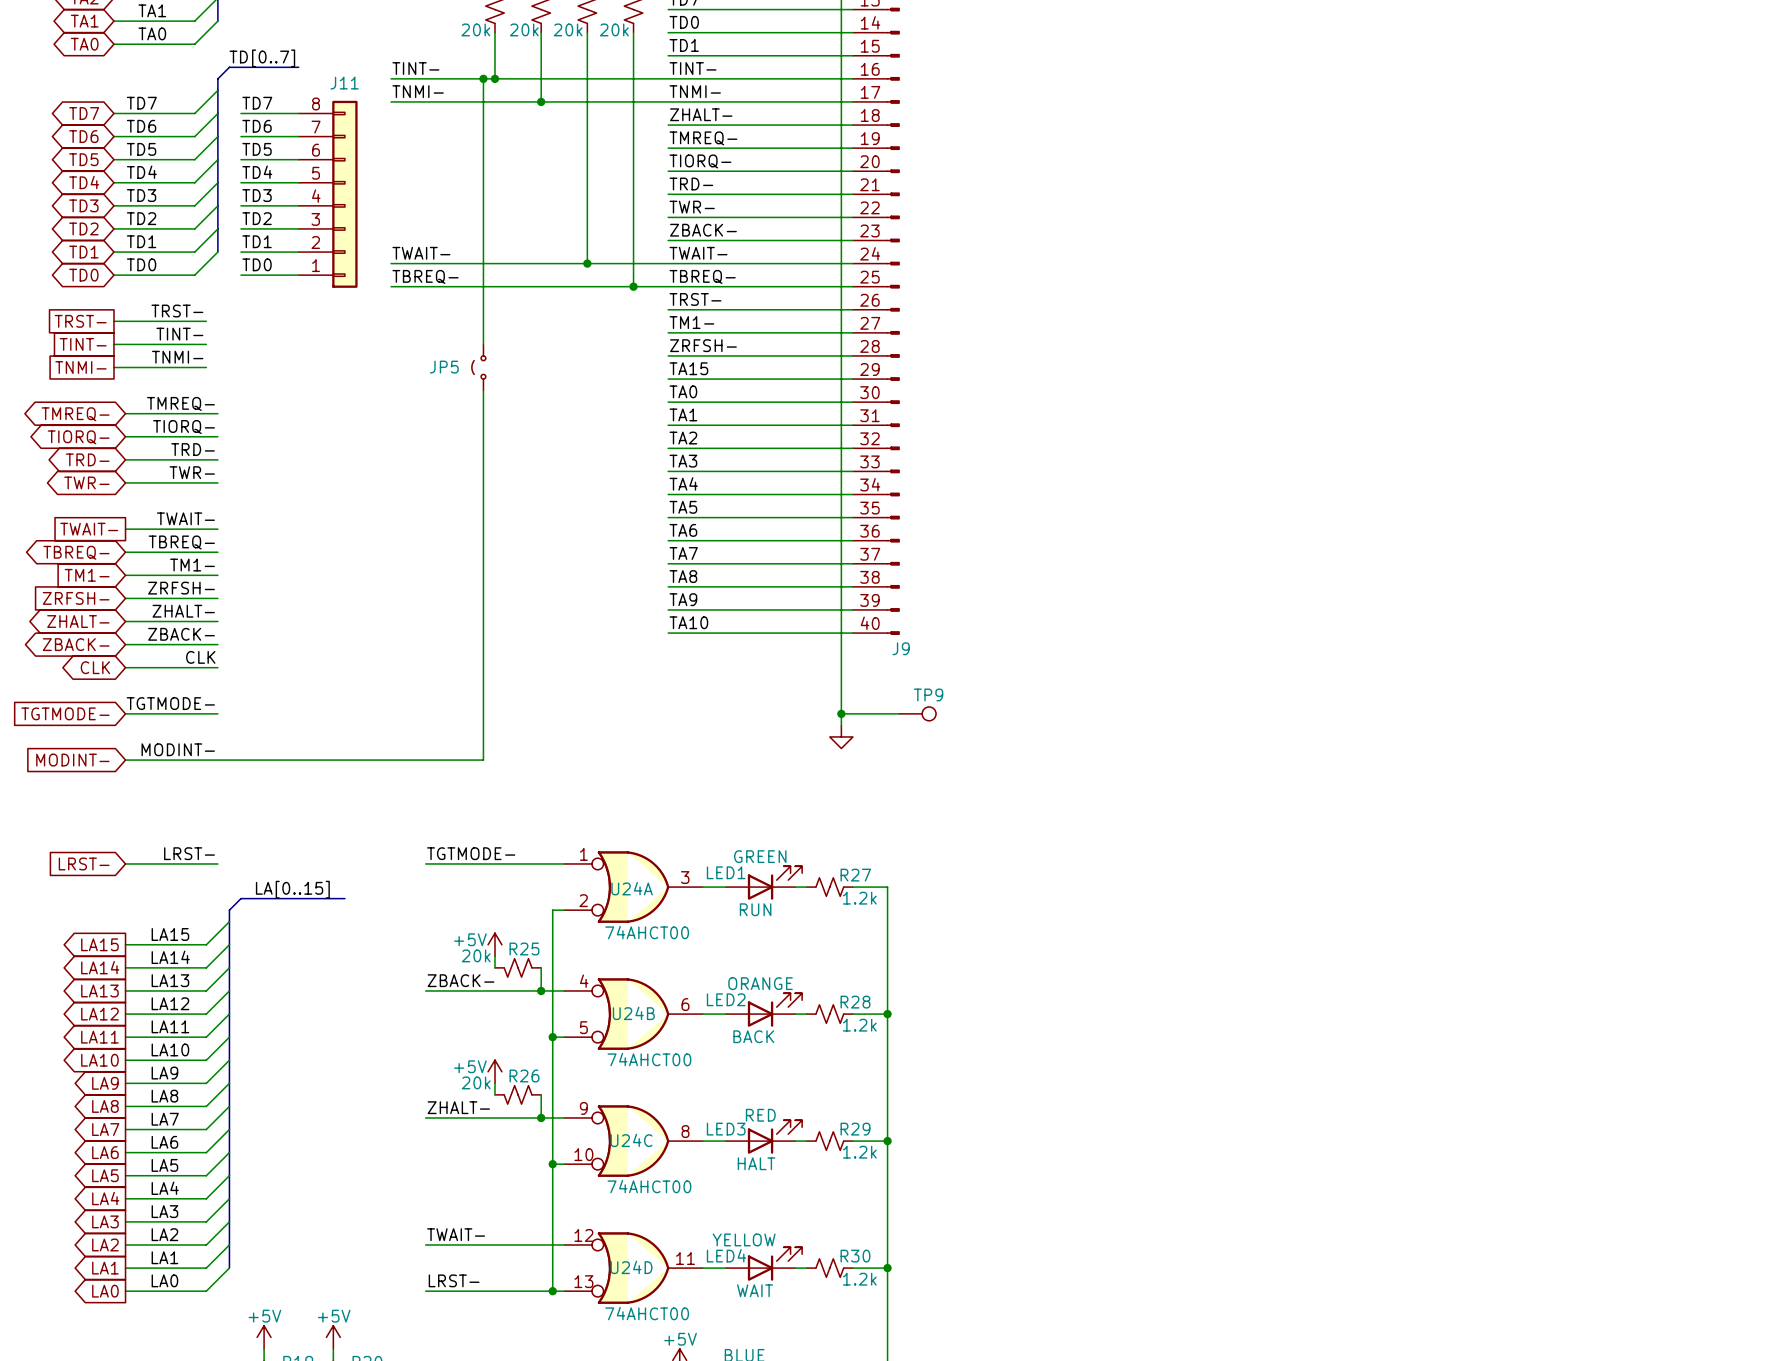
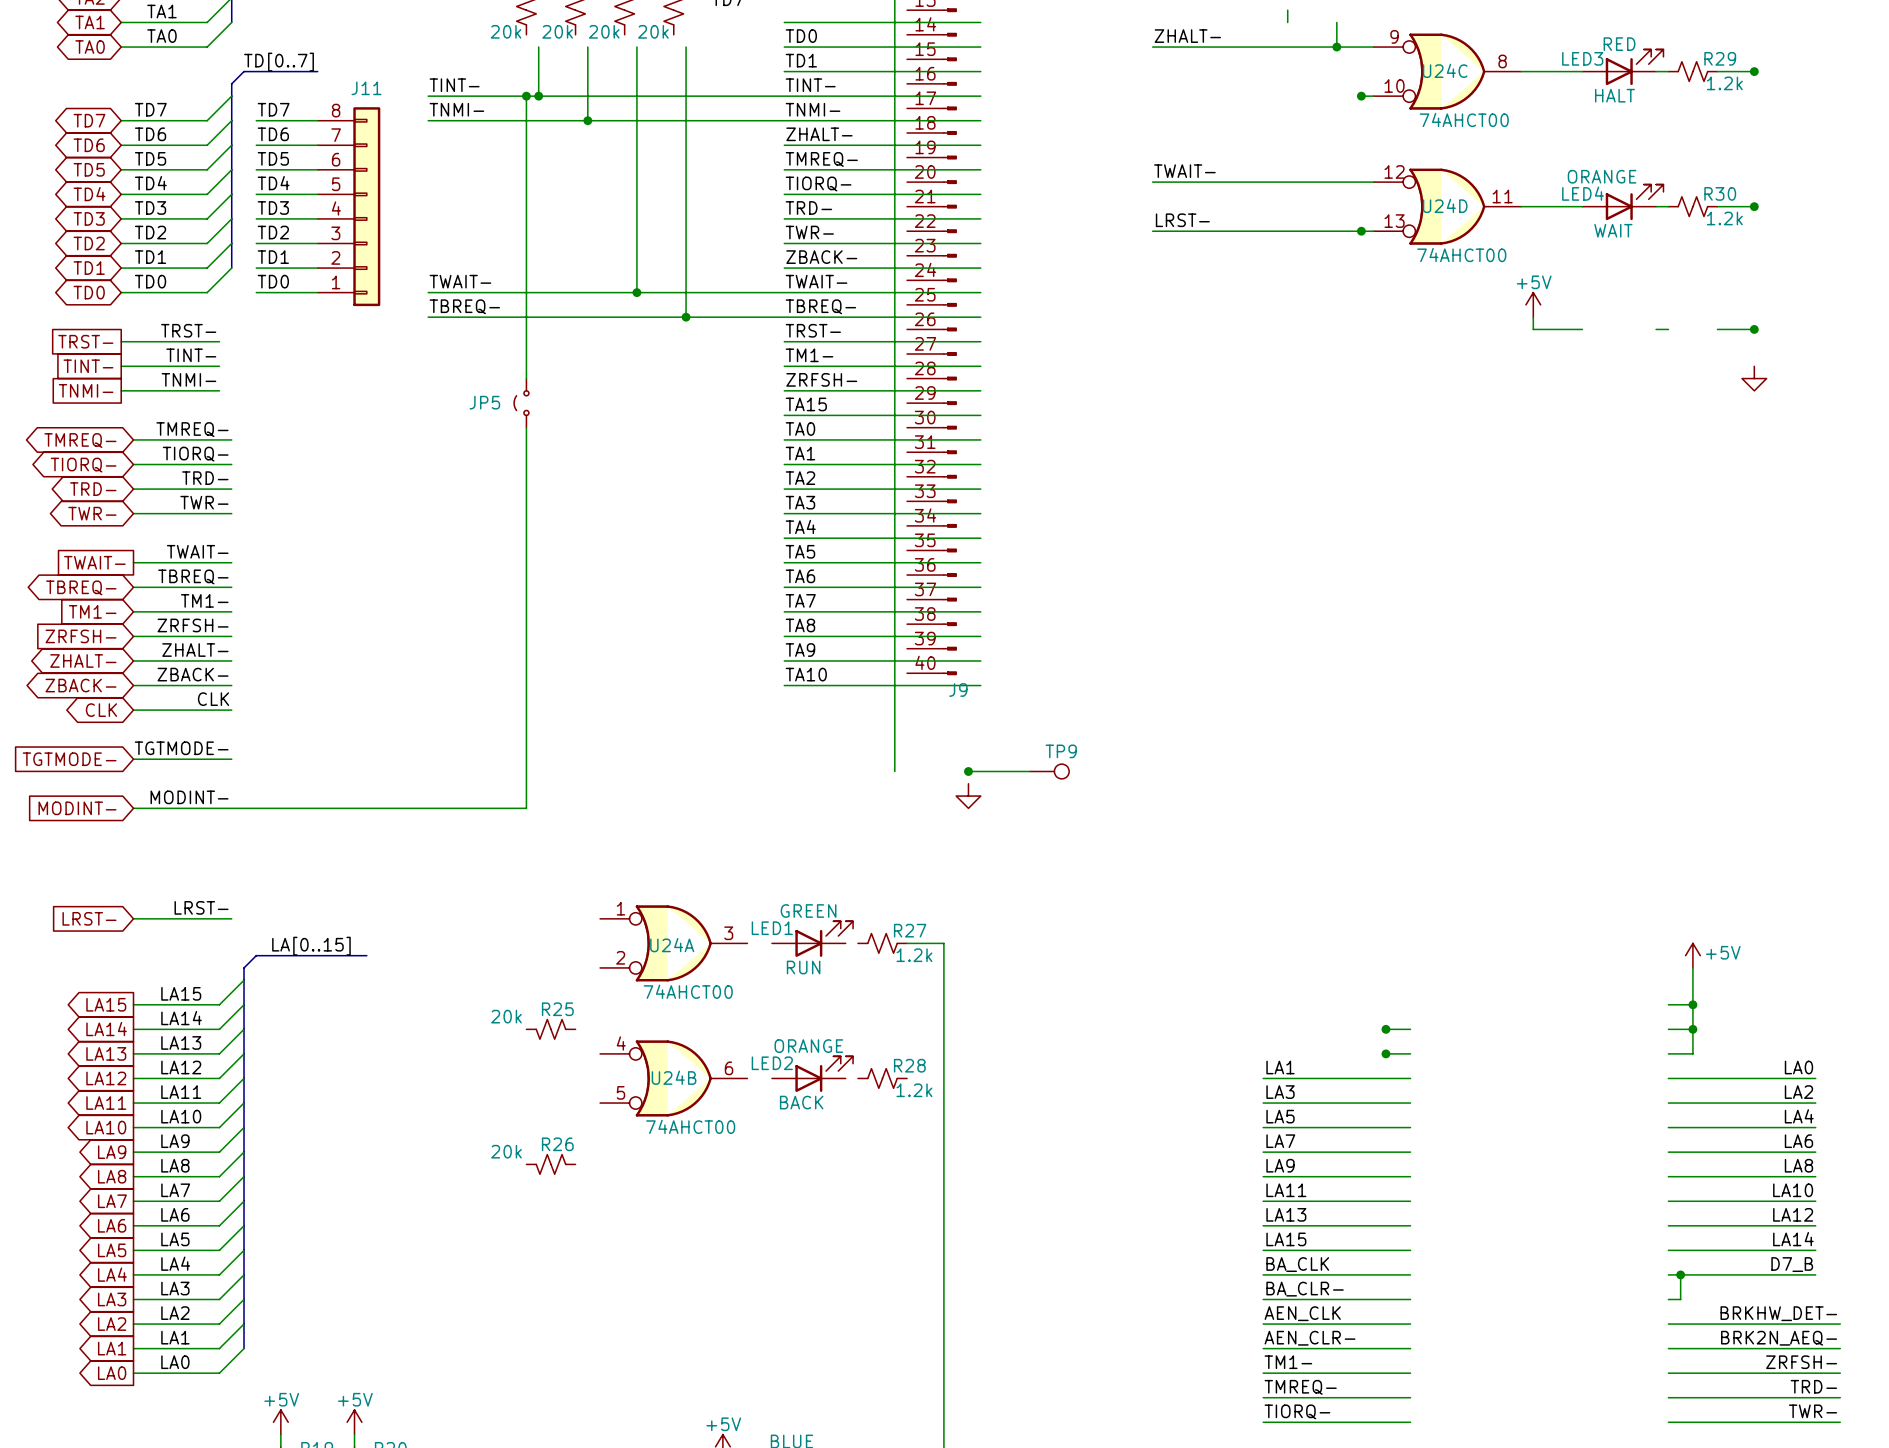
wire: (668, 9) (852, 9) -> (784, 22) (980, 22)
wire: none -> (1287, 10) (1287, 22)
wire: none -> (1336, 22) (1336, 47)
label position: TD0 (684, 22) -> TD0 (801, 36)
wire: (494, 32) (494, 78) -> (538, 47) (538, 96)
wire: (541, 32) (541, 101) -> (587, 47) (587, 120)
wire: (587, 32) (587, 263) -> (636, 47) (636, 292)
wire: (633, 32) (633, 286) -> (686, 47) (686, 317)
wire: (668, 32) (852, 32) -> (784, 47) (980, 47)
label: none -> ZHALT- (1187, 36)
wire: none -> (1152, 47) (1373, 47)
junction: none -> (1336, 47)
label position: TD1 (684, 45) -> TD1 (801, 60)
wire: (668, 55) (852, 55) -> (784, 71) (980, 71)
wire: none -> (1521, 71) (1582, 71)
wire: none -> (1656, 71) (1668, 71)
wire: none -> (1717, 71) (1754, 71)
junction: none -> (1754, 71)
label position: TINT- (415, 68) -> TINT- (454, 85)
label position: TINT- (693, 68) -> TINT- (810, 85)
wire: (391, 78) (852, 78) -> none
wire: (483, 78) (483, 344) -> (526, 96) (526, 378)
junction: (483, 78) -> none
junction: (494, 78) -> none
wire: none -> (428, 96) (980, 96)
junction: none -> (526, 96)
junction: none -> (538, 96)
wire: none -> (1361, 96) (1373, 96)
junction: none -> (1361, 96)
label position: TNMI- (418, 91) -> TNMI- (456, 109)
label position: TNMI- (695, 91) -> TNMI- (813, 109)
wire: (391, 101) (852, 101) -> none
junction position: (541, 101) -> (587, 120)
wire: none -> (428, 120) (980, 120)
label position: ZHALT- (701, 114) -> ZHALT- (819, 134)
wire: (668, 125) (852, 125) -> (784, 145) (980, 145)
label position: TMREQ- (703, 138) -> TMREQ- (821, 159)
wire: (668, 148) (852, 148) -> (784, 169) (980, 169)
label: none -> TWAIT- (1184, 171)
label position: TIORQ- (700, 161) -> TIORQ- (818, 184)
wire: (668, 171) (852, 171) -> (784, 194) (980, 194)
wire: none -> (1152, 182) (1373, 182)
label position: TRD- (691, 184) -> TRD- (808, 207)
wire: (668, 194) (852, 194) -> (784, 218) (980, 218)
wire: none -> (1521, 206) (1582, 206)
wire: none -> (1656, 206) (1668, 206)
wire: none -> (1717, 206) (1754, 206)
junction: none -> (1754, 206)
label position: TWR- (692, 207) -> TWR- (809, 232)
label: none -> LRST- (1182, 220)
wire: (668, 217) (852, 217) -> (784, 243) (980, 243)
wire: none -> (1152, 231) (1373, 231)
junction: none -> (1361, 231)
label position: ZBACK- (703, 230) -> ZBACK- (821, 257)
wire: (668, 240) (852, 240) -> (784, 268) (980, 268)
label position: TWAIT- (421, 253) -> TWAIT- (460, 281)
label position: TWAIT- (698, 253) -> TWAIT- (816, 281)
wire: (391, 263) (852, 263) -> none
junction position: (587, 263) -> (636, 292)
wire: none -> (428, 292) (980, 292)
label position: TBREQ- (425, 276) -> TBREQ- (464, 306)
label position: TBREQ- (702, 276) -> TBREQ- (820, 306)
wire: (391, 286) (852, 286) -> none
junction position: (633, 286) -> (686, 317)
power symbol: none -> +5V (1533, 304)
wire: none -> (428, 317) (980, 317)
wire: none -> (1533, 317) (1533, 329) (1582, 329)
label position: TRST- (695, 299) -> TRST- (813, 330)
wire: (668, 309) (852, 309) -> (784, 341) (980, 341)
wire: none -> (1656, 329) (1668, 329)
wire: none -> (1717, 329) (1754, 329)
junction: none -> (1754, 329)
label position: TM1- (691, 322) -> TM1- (809, 355)
wire: (668, 332) (852, 332) -> (784, 366) (980, 366)
label position: ZRFSH- (703, 345) -> ZRFSH- (821, 379)
wire: (668, 355) (852, 355) -> (784, 390) (980, 390)
power symbol: none -> (1754, 378)
JP5 position: (478, 367) -> (521, 403)
label position: TA15 (688, 368) -> TA15 (806, 404)
wire: (668, 379) (852, 379) -> (784, 415) (980, 415)
wire: (483, 390) (483, 760) -> (526, 427) (526, 808) (514, 808)
label position: TA0 (683, 391) -> TA0 (800, 429)
wire: (668, 402) (852, 402) -> (784, 439) (980, 439)
label position: TA1 (683, 414) -> TA1 (800, 453)
wire: (668, 425) (852, 425) -> (784, 464) (980, 464)
label position: TA2 (683, 438) -> TA2 (800, 478)
wire: (668, 448) (852, 448) -> (784, 489) (980, 489)
label position: TA3 (683, 461) -> TA3 (800, 502)
wire: (668, 471) (852, 471) -> (784, 513) (980, 513)
label position: TA4 (683, 483) -> TA4 (800, 526)
wire: (668, 494) (852, 494) -> (784, 538) (980, 538)
label position: TA5 (683, 507) -> TA5 (800, 551)
wire: (668, 517) (852, 517) -> (784, 562) (980, 562)
label position: TA6 (683, 530) -> TA6 (800, 576)
wire: (668, 540) (852, 540) -> (784, 587) (980, 587)
label position: TA7 (683, 553) -> TA7 (800, 600)
wire: (668, 563) (852, 563) -> (784, 611) (980, 611)
label position: TA8 (683, 576) -> TA8 (800, 625)
wire: (668, 586) (852, 586) -> (784, 636) (980, 636)
label position: TA9 (683, 599) -> TA9 (800, 650)
wire: (668, 609) (852, 609) -> (784, 660) (980, 660)
label position: TA10 (688, 622) -> TA10 (806, 674)
wire: (668, 633) (852, 633) -> (784, 685) (980, 685)
wire: (841, 713) (899, 713) -> (968, 771) (1029, 771)
junction: (841, 713) -> none
TP9 position: (917, 713) -> (1049, 771)
junction: none -> (968, 771)
power symbol position: (841, 736) -> (968, 796)
label: TGTMODE- (471, 853) -> none
wire: (425, 863) (564, 863) -> none
wire: (702, 887) (725, 887) -> none
wire: (795, 887) (806, 887) -> none
power symbol: none -> +5V (1692, 955)
wire: (564, 910) (552, 910) (552, 1291) -> none
wire: none -> (1692, 967) (1692, 1053) (1668, 1053)
power symbol: +5V (494, 944) -> none
wire: none -> (1668, 1004) (1692, 1004)
junction: none -> (1692, 1004)
wire: (494, 956) (494, 967) -> none
wire: (541, 967) (541, 990) -> none
wire: none -> (1385, 1029) (1410, 1029)
junction: none -> (1385, 1029)
wire: none -> (1668, 1029) (1692, 1029)
junction: none -> (1692, 1029)
label: ZBACK- (460, 980) -> none
wire: (425, 990) (564, 990) -> none
junction: (541, 990) -> none
wire: none -> (1385, 1053) (1410, 1053)
junction: none -> (1385, 1053)
label: none -> LA1 (1280, 1067)
label: none -> LA0 (1798, 1067)
wire: (702, 1014) (725, 1014) -> none
wire: (795, 1014) (806, 1014) -> none
wire: (852, 1014) (887, 1014) -> none
junction: (887, 1014) -> none
wire: none -> (1263, 1078) (1410, 1078)
wire: none -> (1668, 1078) (1815, 1078)
label: none -> LA3 (1280, 1092)
label: none -> LA2 (1798, 1092)
wire: (552, 1037) (564, 1037) -> none
junction: (552, 1037) -> none
wire: none -> (1263, 1103) (1410, 1103)
wire: none -> (1668, 1103) (1815, 1103)
label: none -> LA5 (1280, 1116)
label: none -> LA4 (1799, 1116)
wire: none -> (1263, 1127) (1410, 1127)
wire: none -> (1668, 1127) (1815, 1127)
power symbol: +5V (494, 1071) -> none
label: none -> LA7 (1280, 1141)
label: none -> LA6 (1798, 1141)
wire: (494, 1083) (494, 1094) -> none
wire: none -> (1263, 1152) (1410, 1152)
wire: none -> (1668, 1152) (1815, 1152)
wire: (541, 1094) (541, 1117) -> none
label: none -> LA9 (1280, 1165)
label: none -> LA8 (1798, 1165)
wire: none -> (1263, 1176) (1410, 1176)
wire: none -> (1668, 1176) (1815, 1176)
label: ZHALT- (458, 1107) -> none
wire: (425, 1117) (564, 1117) -> none
junction: (541, 1117) -> none
label: none -> LA11 (1286, 1190)
label: none -> LA10 (1793, 1190)
wire: none -> (1263, 1201) (1410, 1201)
wire: none -> (1668, 1201) (1815, 1201)
LED3 position: (764, 1137) -> (1622, 67)
U24C position: (633, 1141) -> (1447, 71)
wire: (702, 1141) (725, 1141) -> none
wire: (795, 1141) (806, 1141) -> none
R29 position: (829, 1141) -> (1692, 71)
wire: (852, 1141) (887, 1141) -> none
junction: (887, 1141) -> none
label: none -> LA13 (1286, 1214)
label: none -> LA12 (1793, 1214)
wire: none -> (1263, 1225) (1410, 1225)
wire: none -> (1668, 1225) (1815, 1225)
wire: (552, 1164) (564, 1164) -> none
junction: (552, 1164) -> none
label: none -> LA15 (1286, 1239)
label: none -> LA14 (1793, 1239)
wire: none -> (1263, 1250) (1410, 1250)
wire: none -> (1668, 1250) (1815, 1250)
label: none -> BA_CLK (1297, 1264)
label: none -> D7_B (1792, 1264)
wire: none -> (1263, 1274) (1410, 1274)
wire: none -> (1668, 1274) (1815, 1274)
wire: none -> (1680, 1274) (1680, 1299) (1668, 1299)
junction: none -> (1680, 1274)
label: none -> BA_CLR- (1305, 1289)
wire: none -> (1263, 1299) (1410, 1299)
label: TWAIT- (456, 1234) -> none
label: none -> AEN_CLK (1302, 1313)
label: none -> BRKHW_DET- (1778, 1313)
LED4 text: YELLOW (744, 1239) -> ORANGE (1602, 176)
wire: (425, 1244) (564, 1244) -> none
wire: none -> (1263, 1324) (1410, 1324)
wire: none -> (1668, 1324) (1840, 1324)
label: none -> AEN_CLR- (1310, 1338)
label: none -> BRK2N_AEQ- (1779, 1338)
LED4 position: (764, 1264) -> (1622, 202)
U24D position: (633, 1268) -> (1447, 206)
wire: (702, 1268) (725, 1268) -> none
wire: (795, 1268) (806, 1268) -> none
R30 position: (829, 1268) -> (1692, 206)
wire: (852, 1268) (887, 1268) -> none
junction: (887, 1268) -> none
wire: none -> (1263, 1348) (1410, 1348)
wire: none -> (1668, 1348) (1840, 1348)
label: LRST- (454, 1280) -> none
label: none -> TM1- (1288, 1362)
label: none -> ZRFSH- (1801, 1362)
wire: (425, 1291) (564, 1291) -> none
junction: (552, 1291) -> none
wire: none -> (1263, 1373) (1410, 1373)
wire: none -> (1668, 1373) (1840, 1373)
label: none -> TRD- (1813, 1386)
label: none -> TMREQ- (1300, 1387)
wire: none -> (1263, 1397) (1410, 1397)
wire: none -> (1668, 1397) (1840, 1397)
label: none -> TIORQ- (1297, 1411)
label: none -> TWR- (1813, 1411)
wire: none -> (1263, 1422) (1410, 1422)
wire: none -> (1668, 1422) (1840, 1422)

